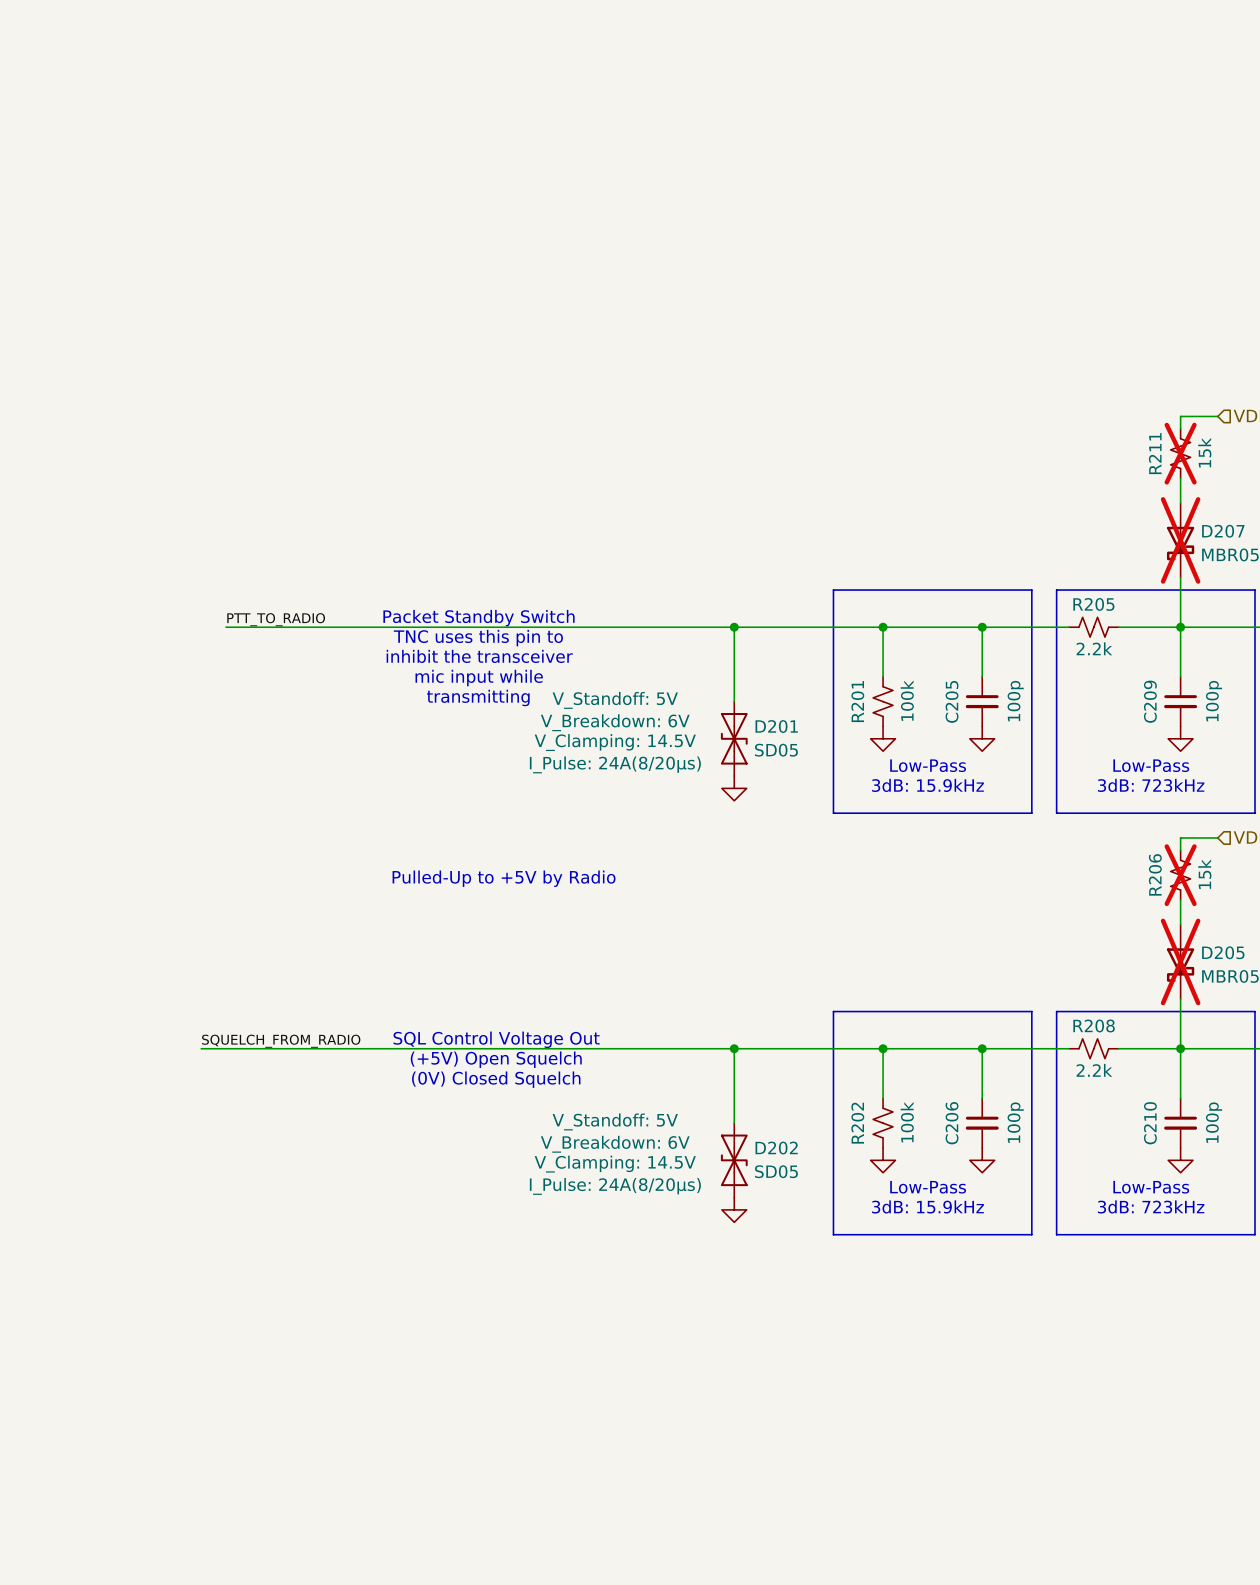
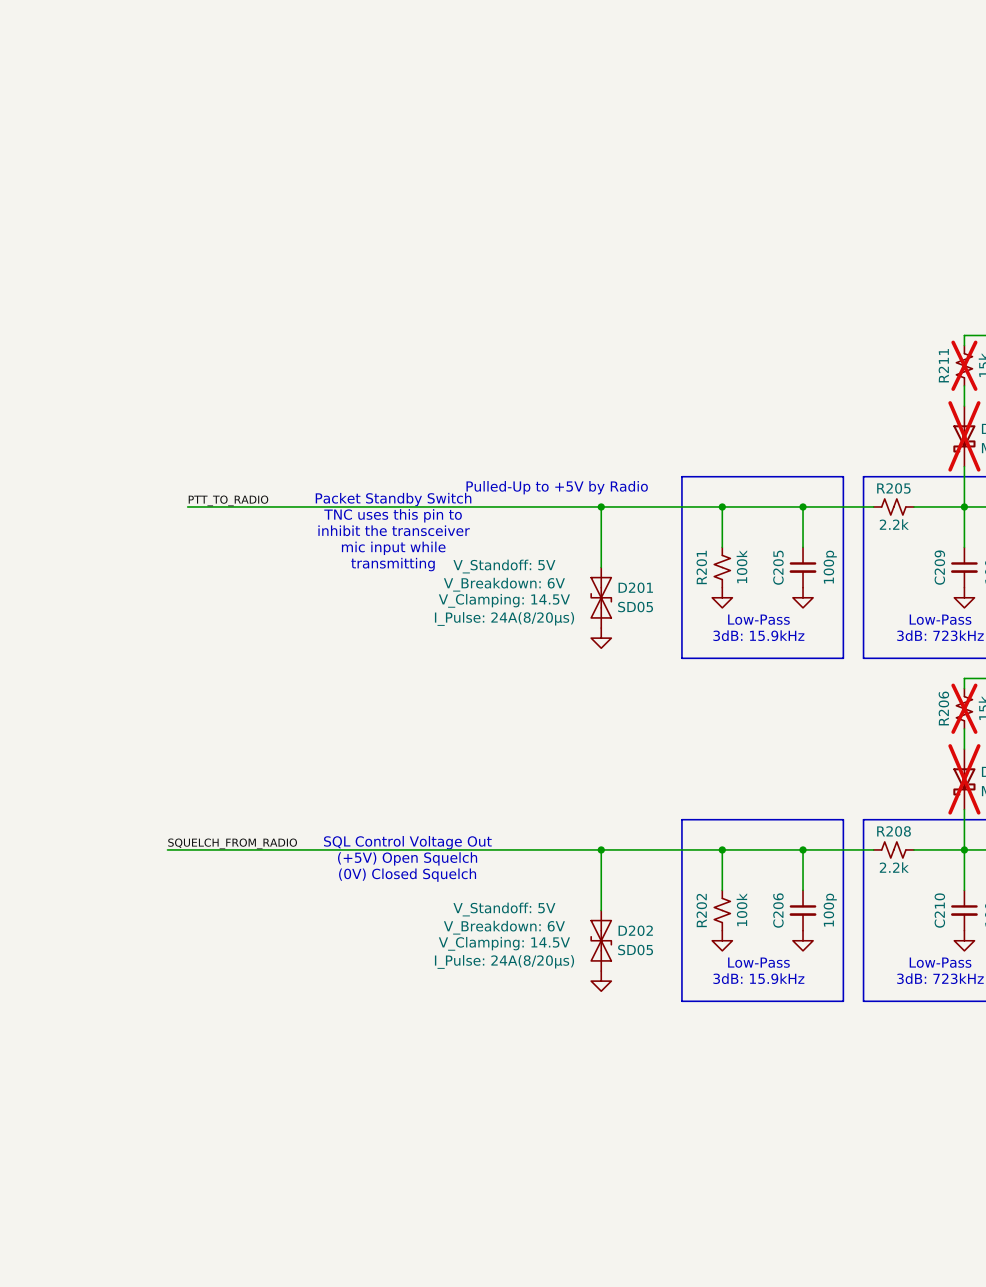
text: none -> Pulled-Up to +5V by Radio (557, 487)
text: Pulled-Up to +5V by Radio (504, 878) -> none

